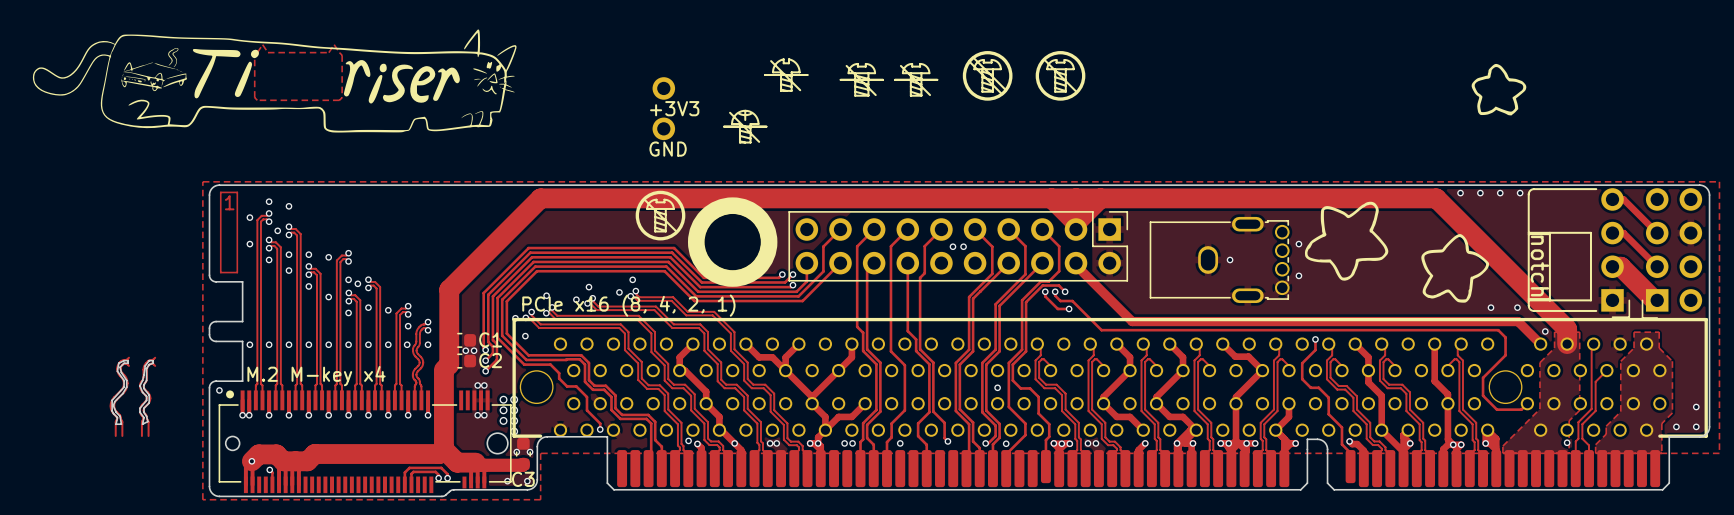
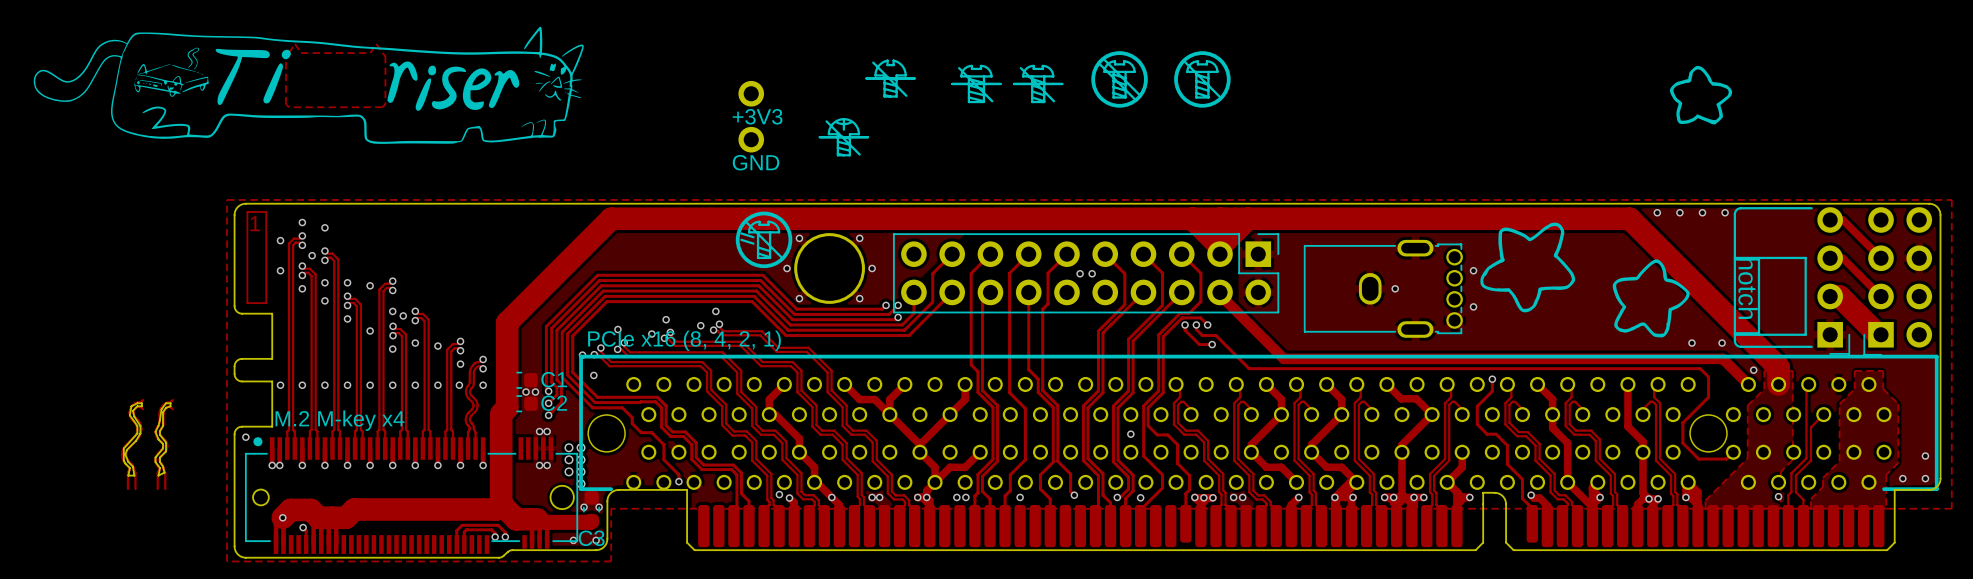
drawing: [687, 197, 778, 287] -> none
line: (643, 199) (677, 232) -> (745, 221) (782, 258)
line: (656, 199) (656, 202) (668, 200) (673, 208) (647, 208) (649, 202) (656, 199) -> (759, 221) (759, 224) (768, 224) (768, 221) (773, 222) (777, 226) (779, 232) (748, 232) (752, 224) (759, 221)
line: (655, 208) (655, 231) (665, 231) (665, 208) -> (758, 232) (758, 257) (770, 257) (770, 232)
drawing position: (660, 215) -> (764, 239)
line: (655, 222) (665, 225) -> (758, 247) (770, 251)
line: (655, 227) (665, 230) -> (758, 253) (770, 257)

